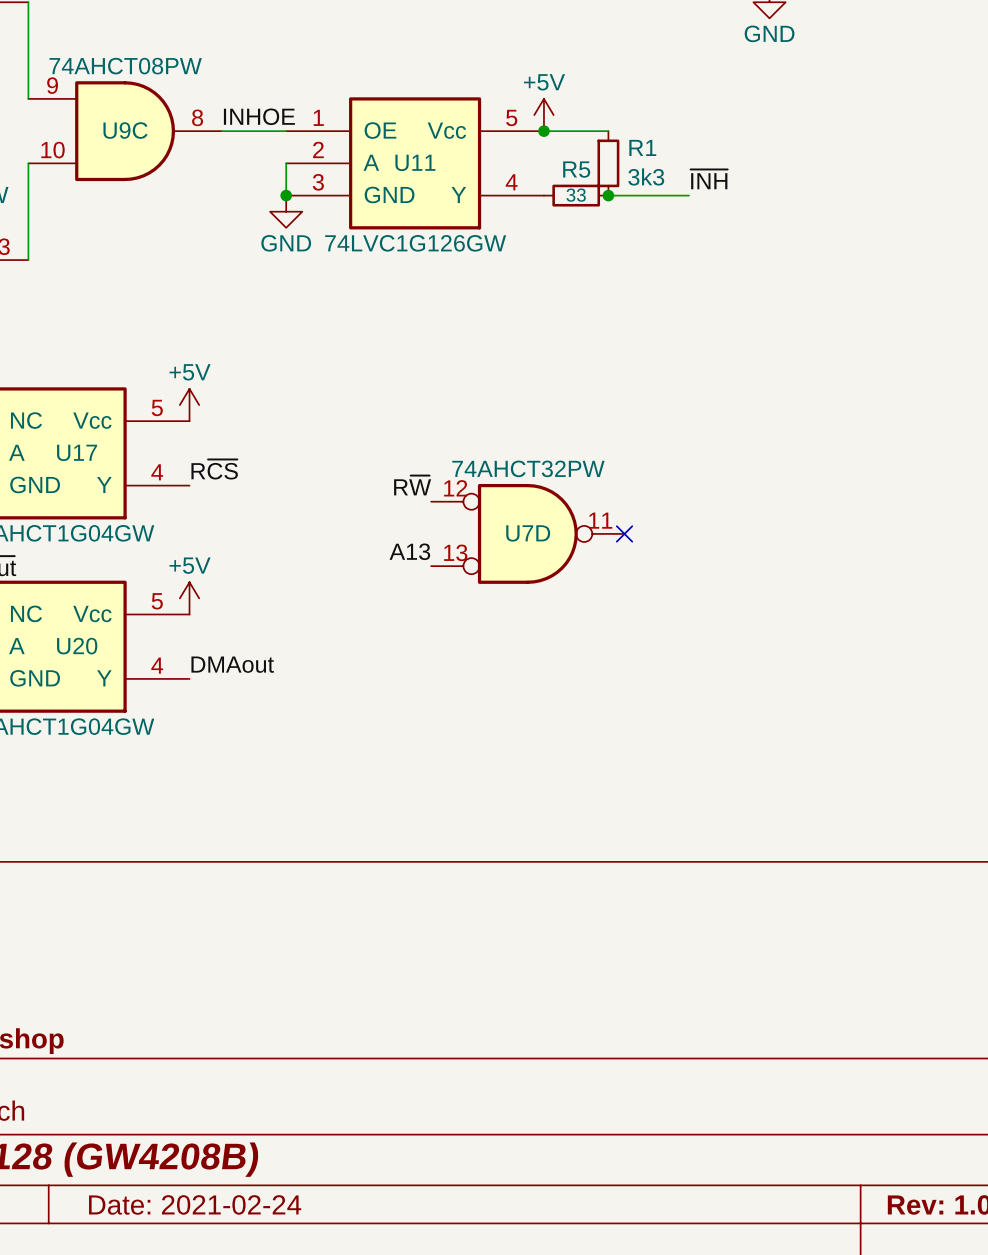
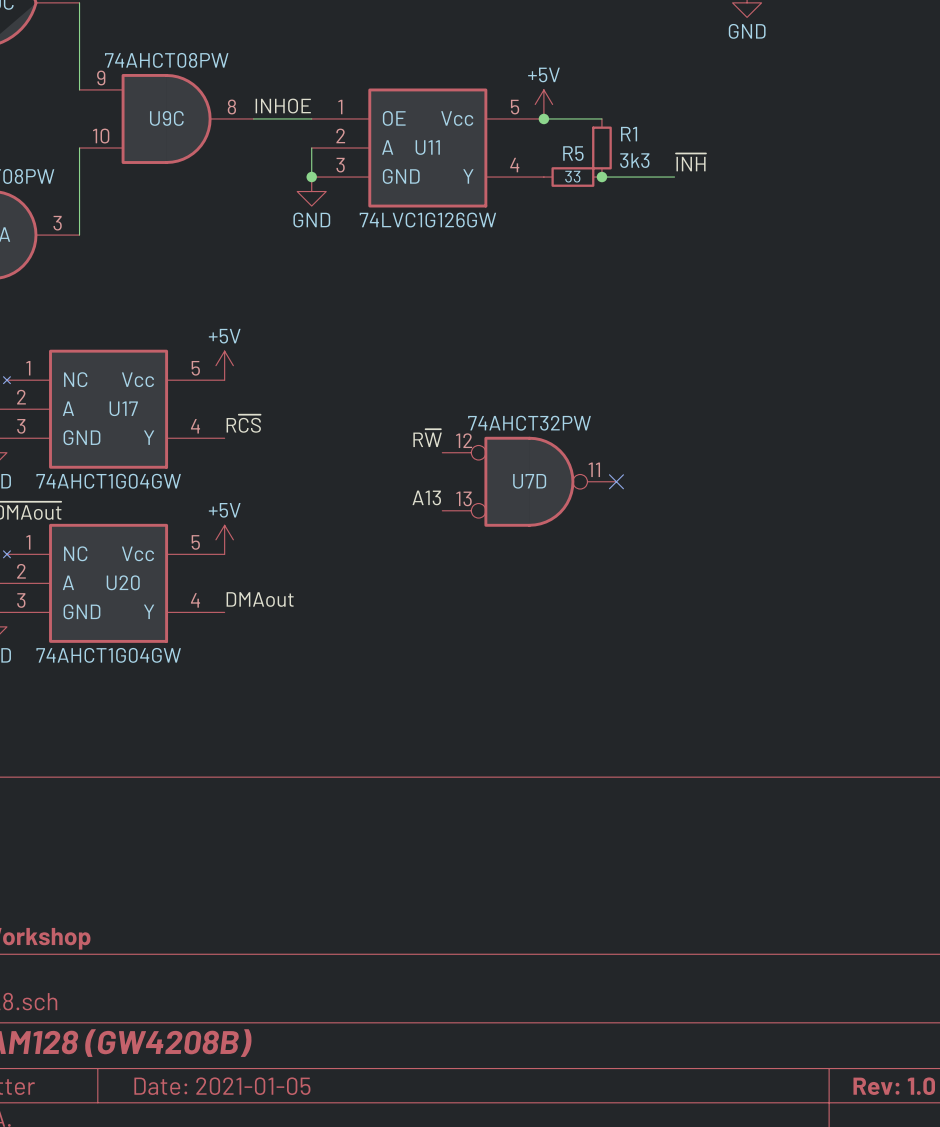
title block: Date: 2021-02-24 (195, 1204) -> Date: 2021-01-05 (222, 1086)

